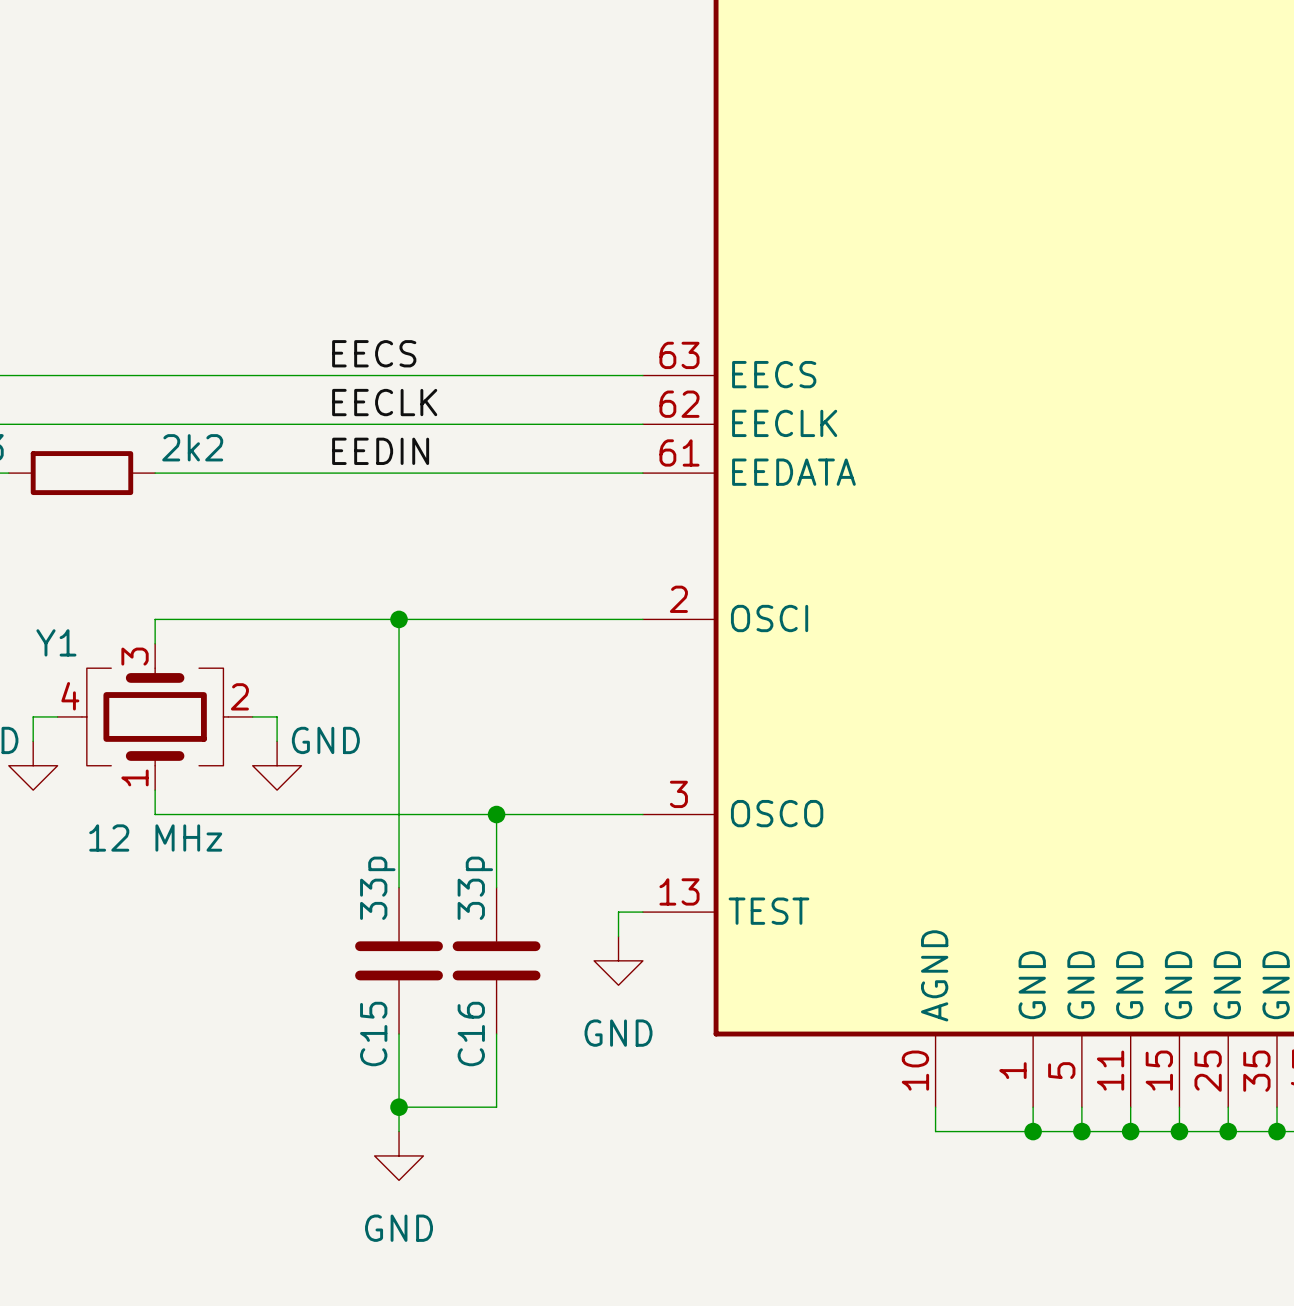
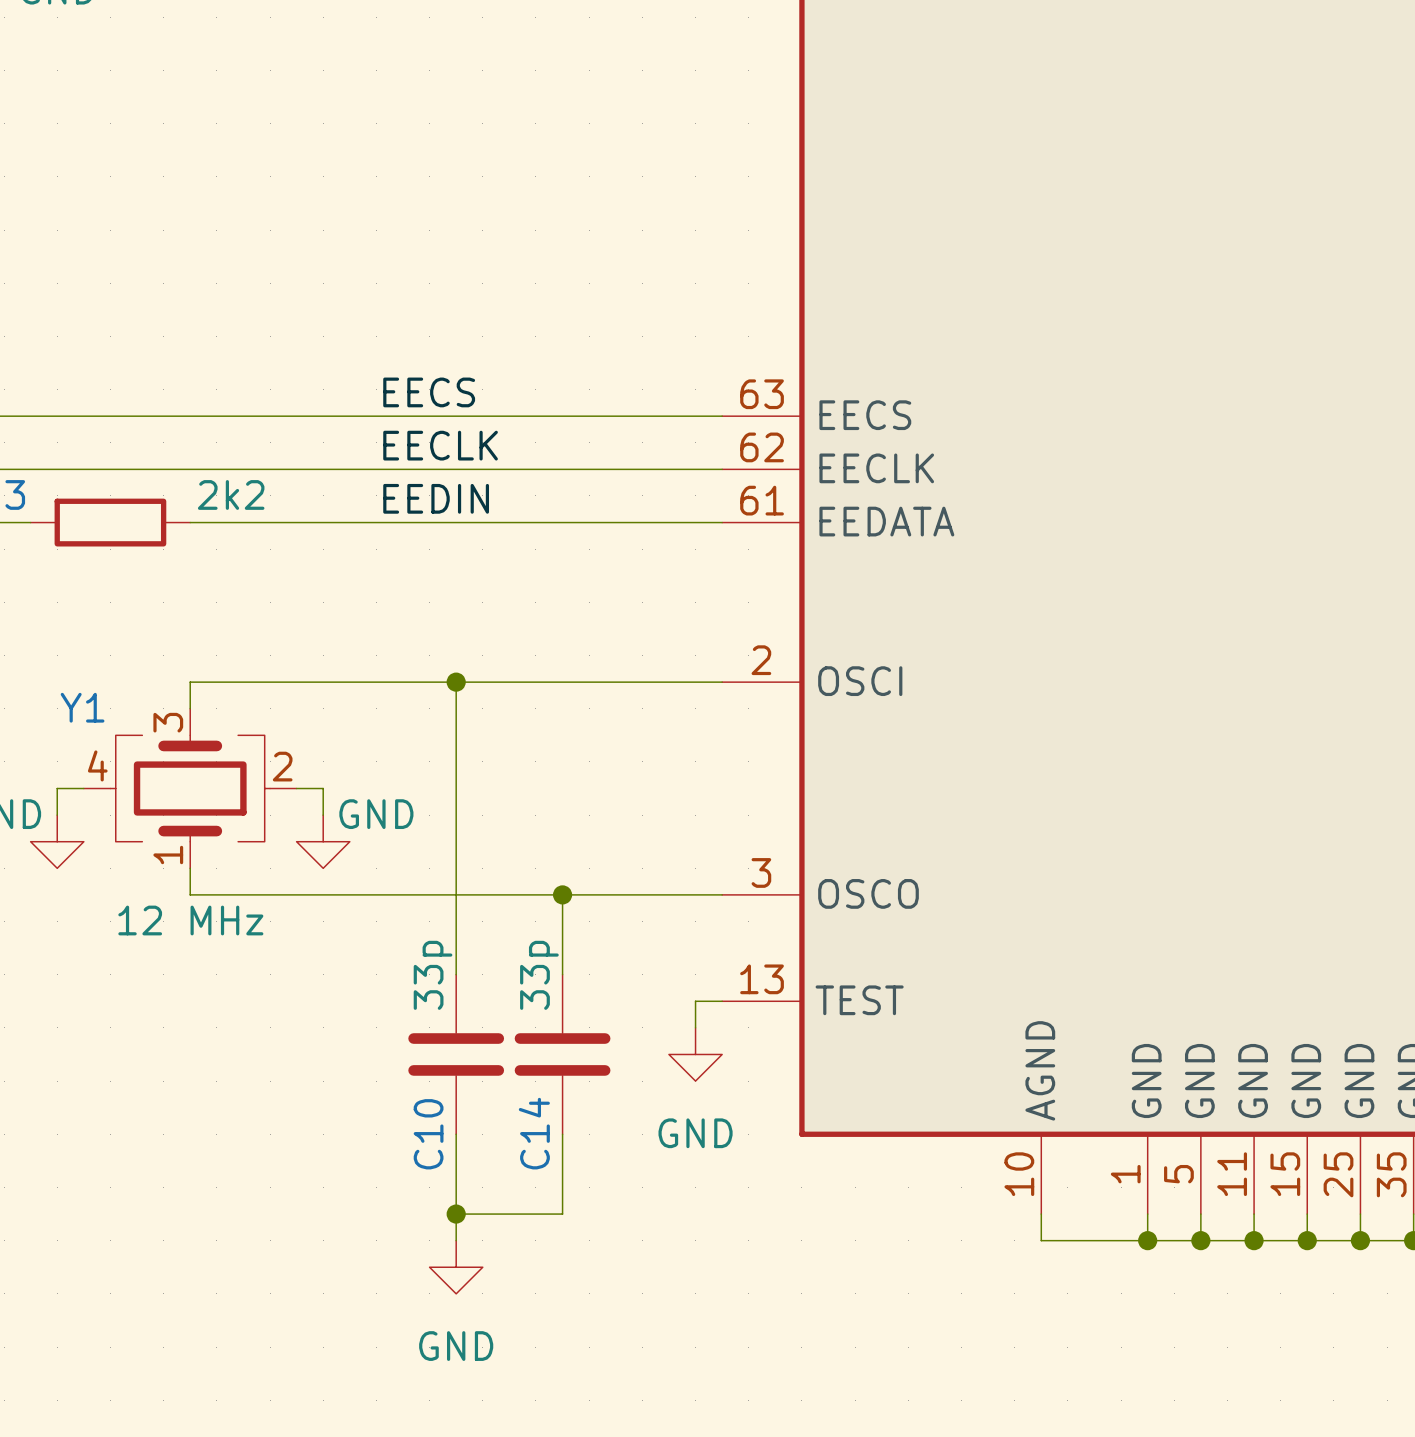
C15 name: C15 (373, 1034) -> C10 (428, 1134)
C16 name: C16 (471, 1034) -> C14 (534, 1133)

